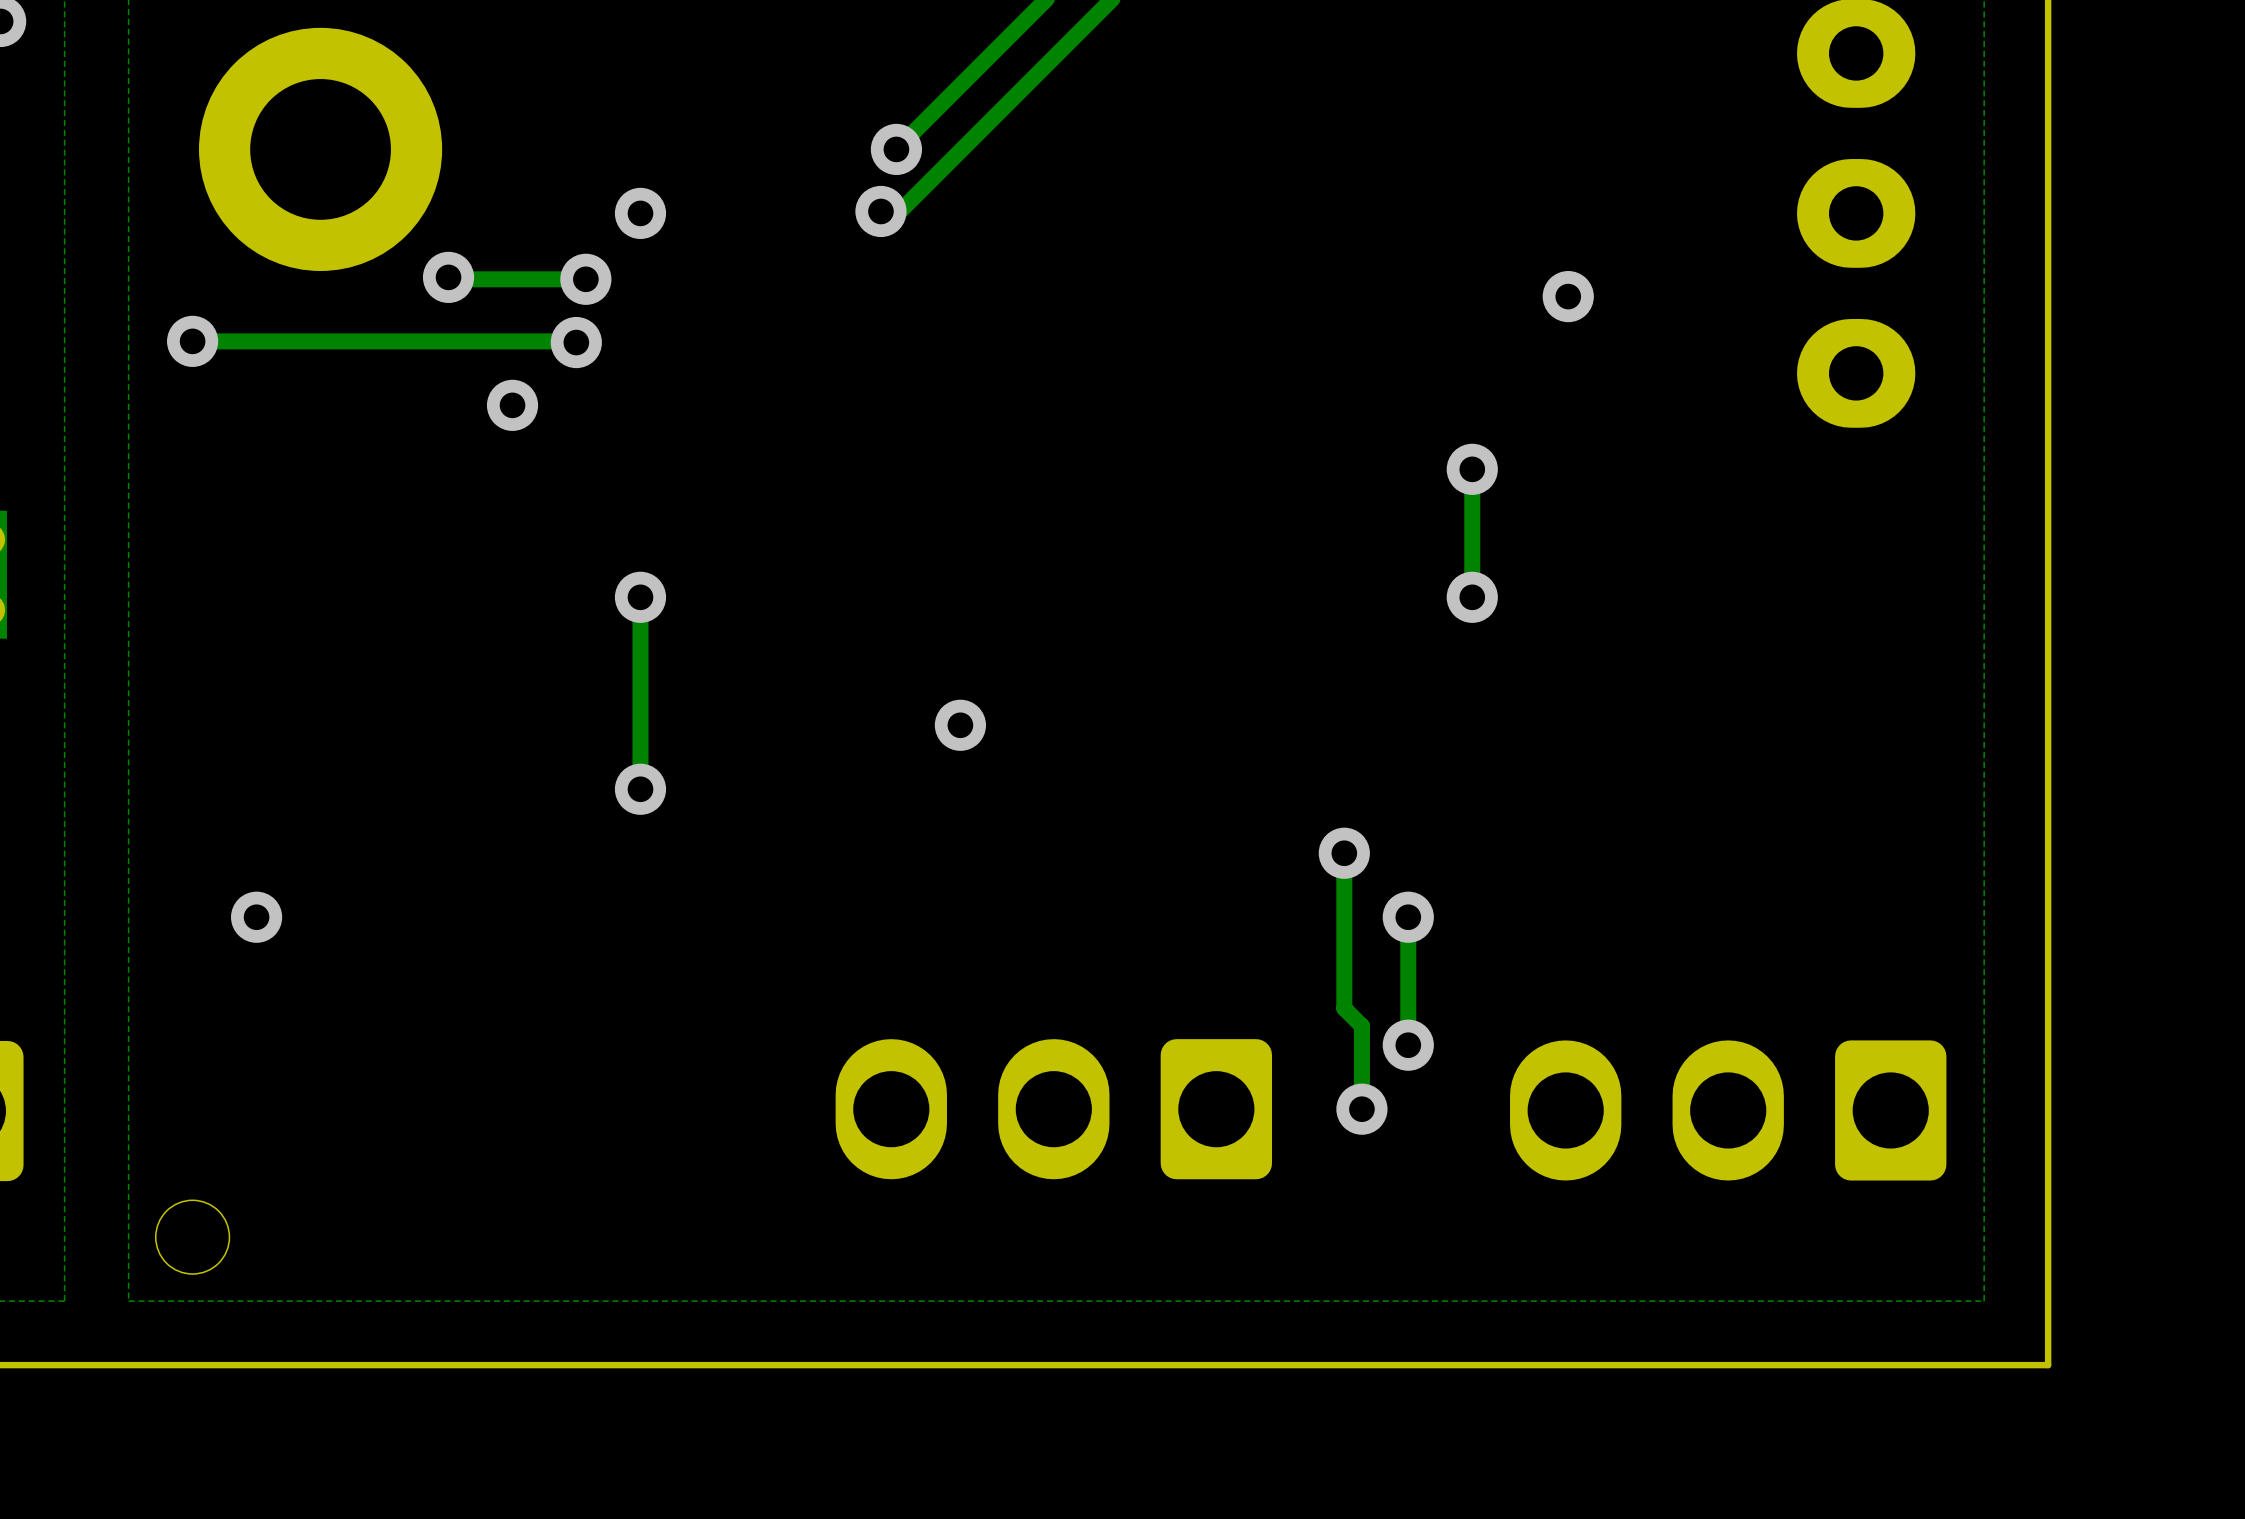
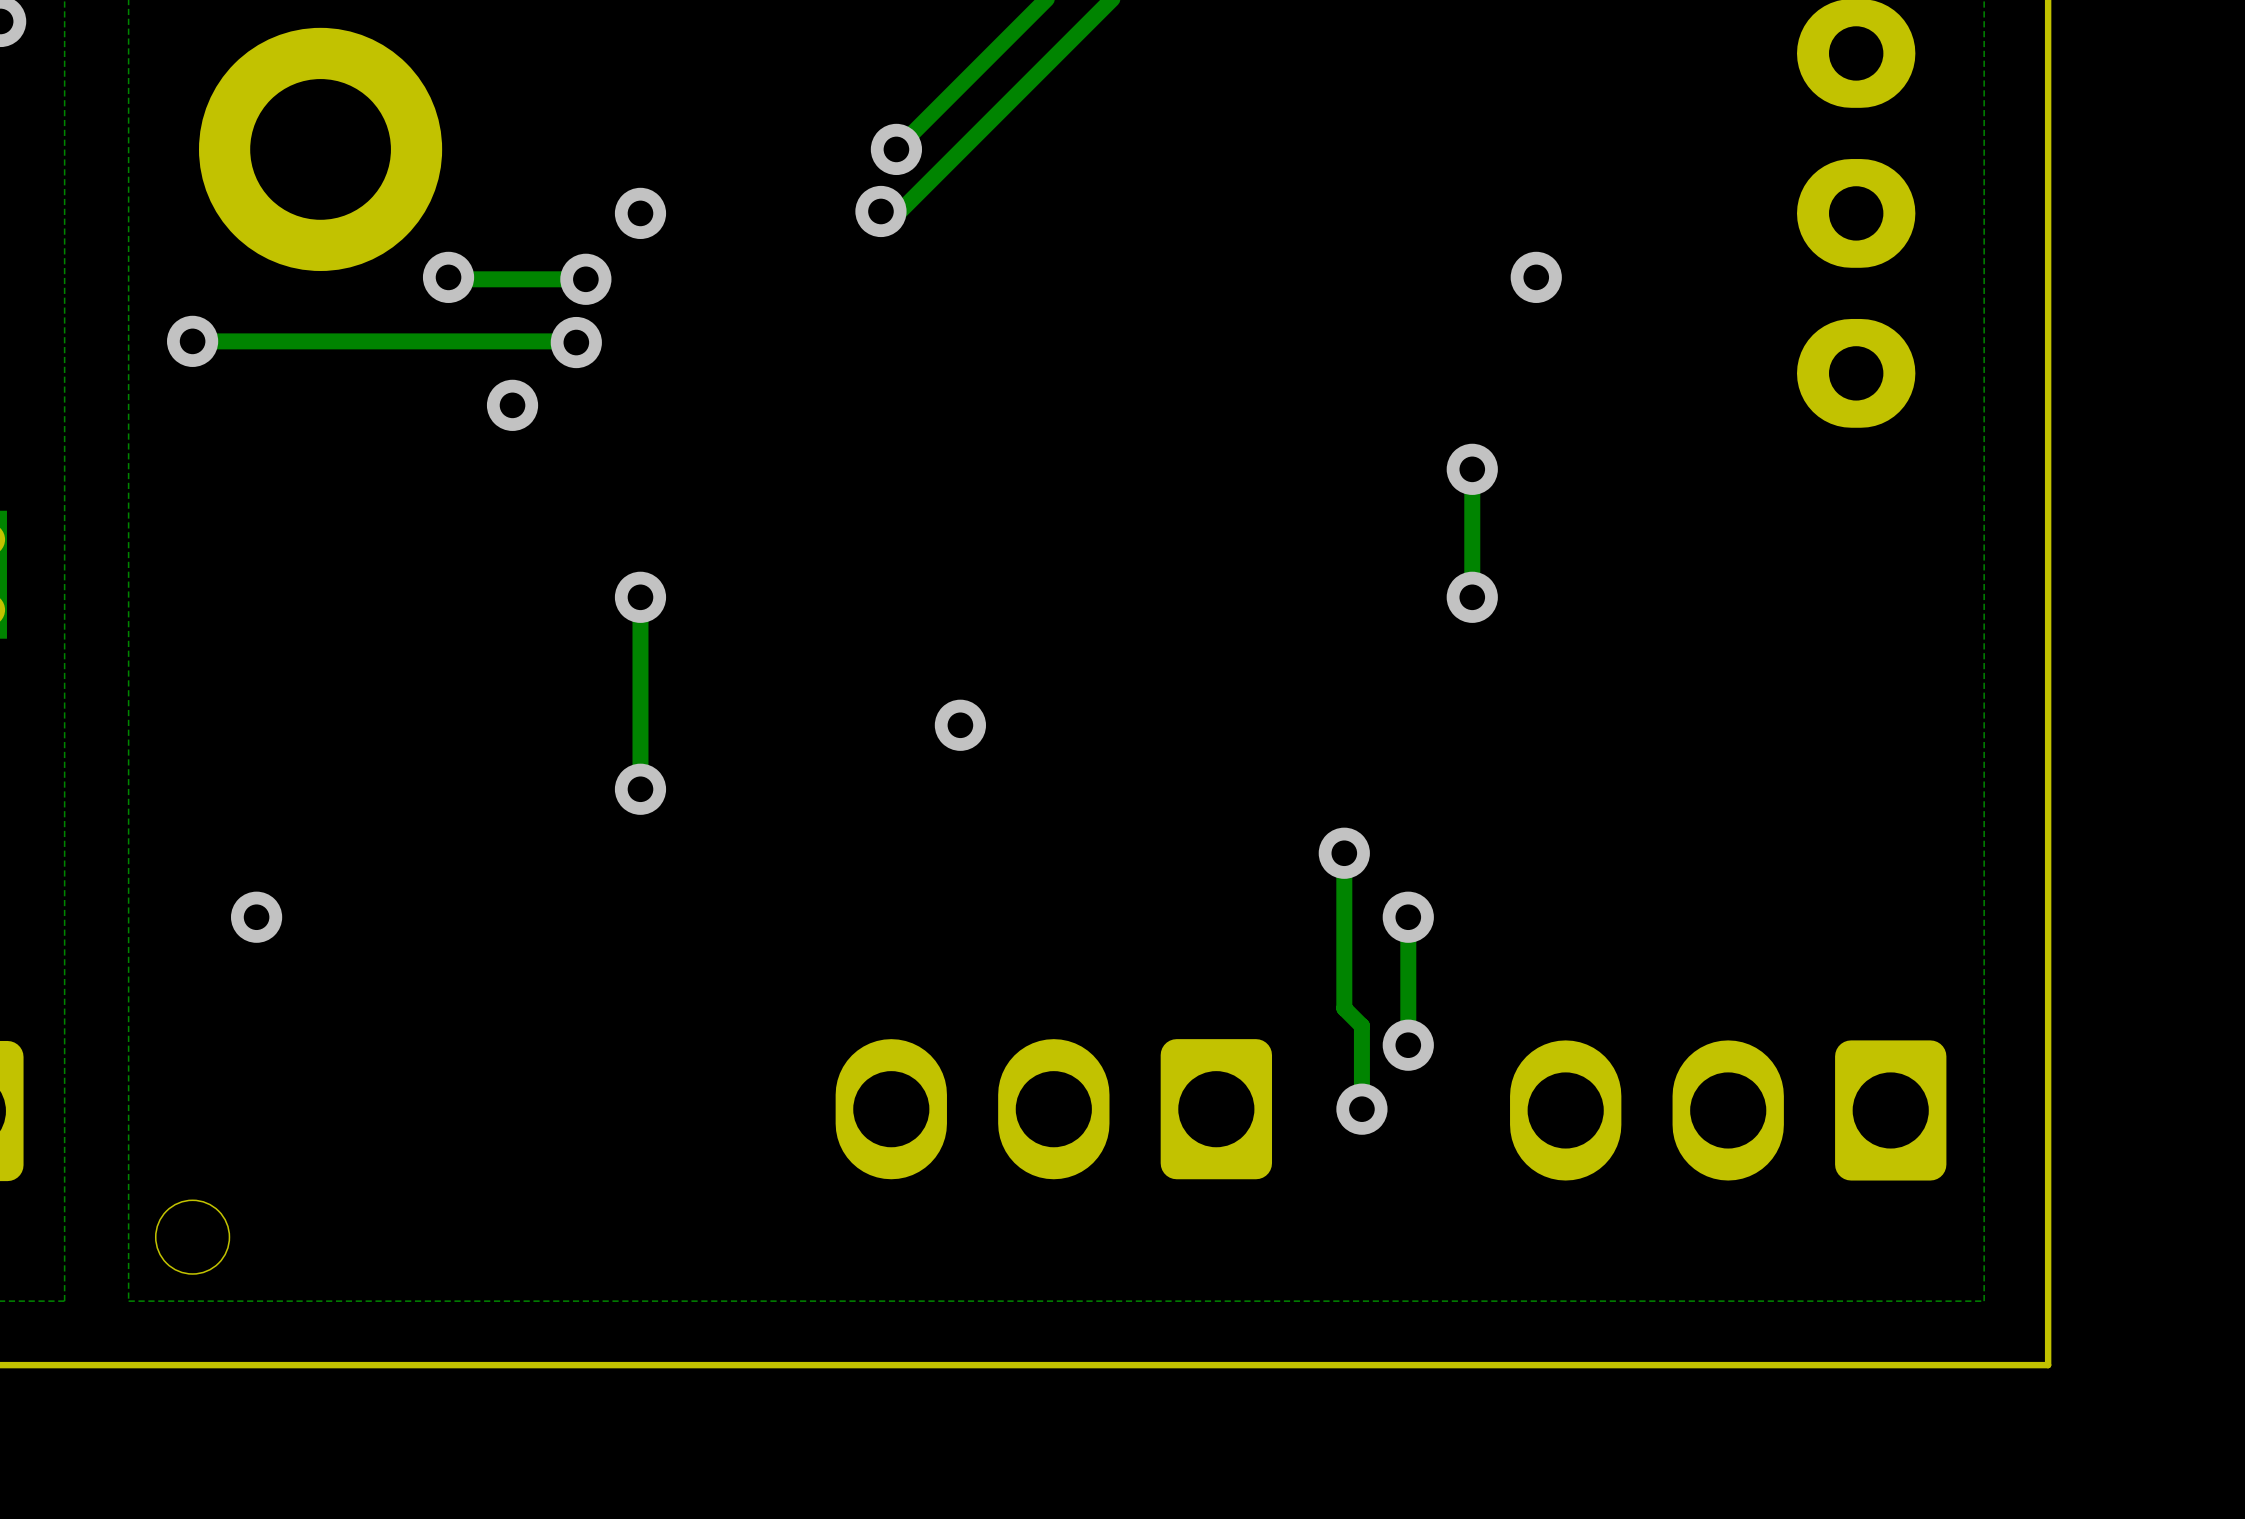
via position: (1568, 296) -> (1536, 277)

